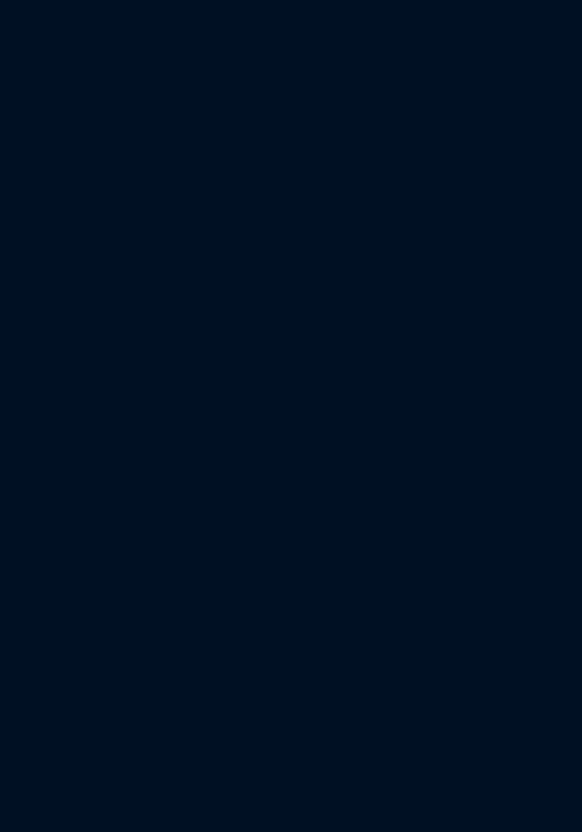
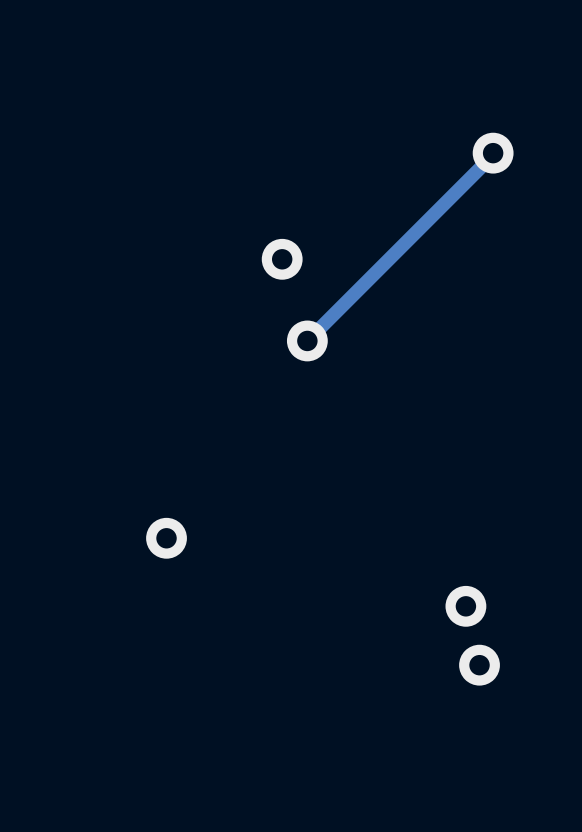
track: none -> (493, 153) (307, 340)
via: none -> (493, 153)
via: none -> (282, 259)
via: none -> (307, 340)
via: none -> (166, 538)
via: none -> (465, 606)
via: none -> (479, 665)

